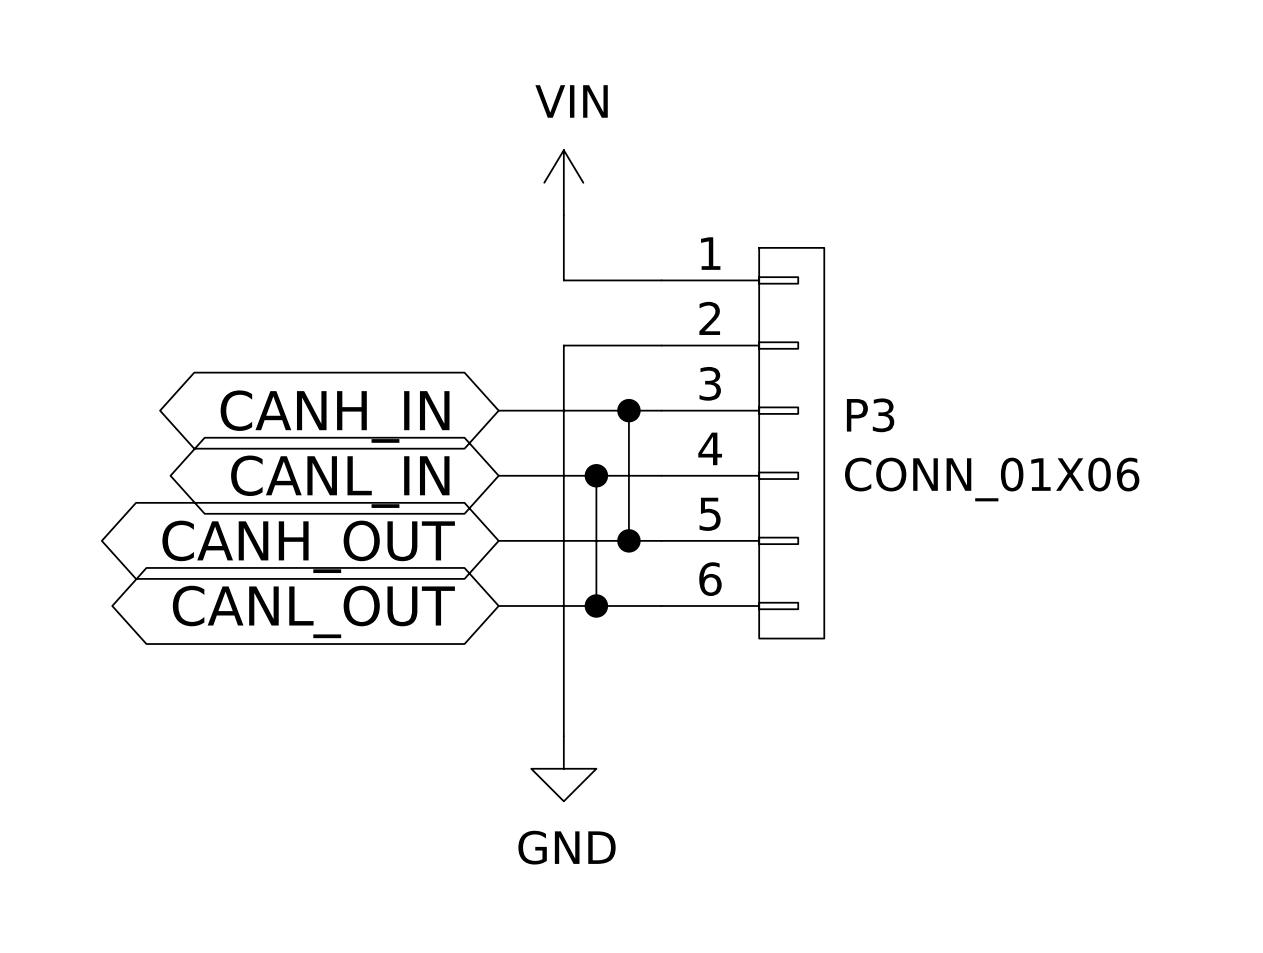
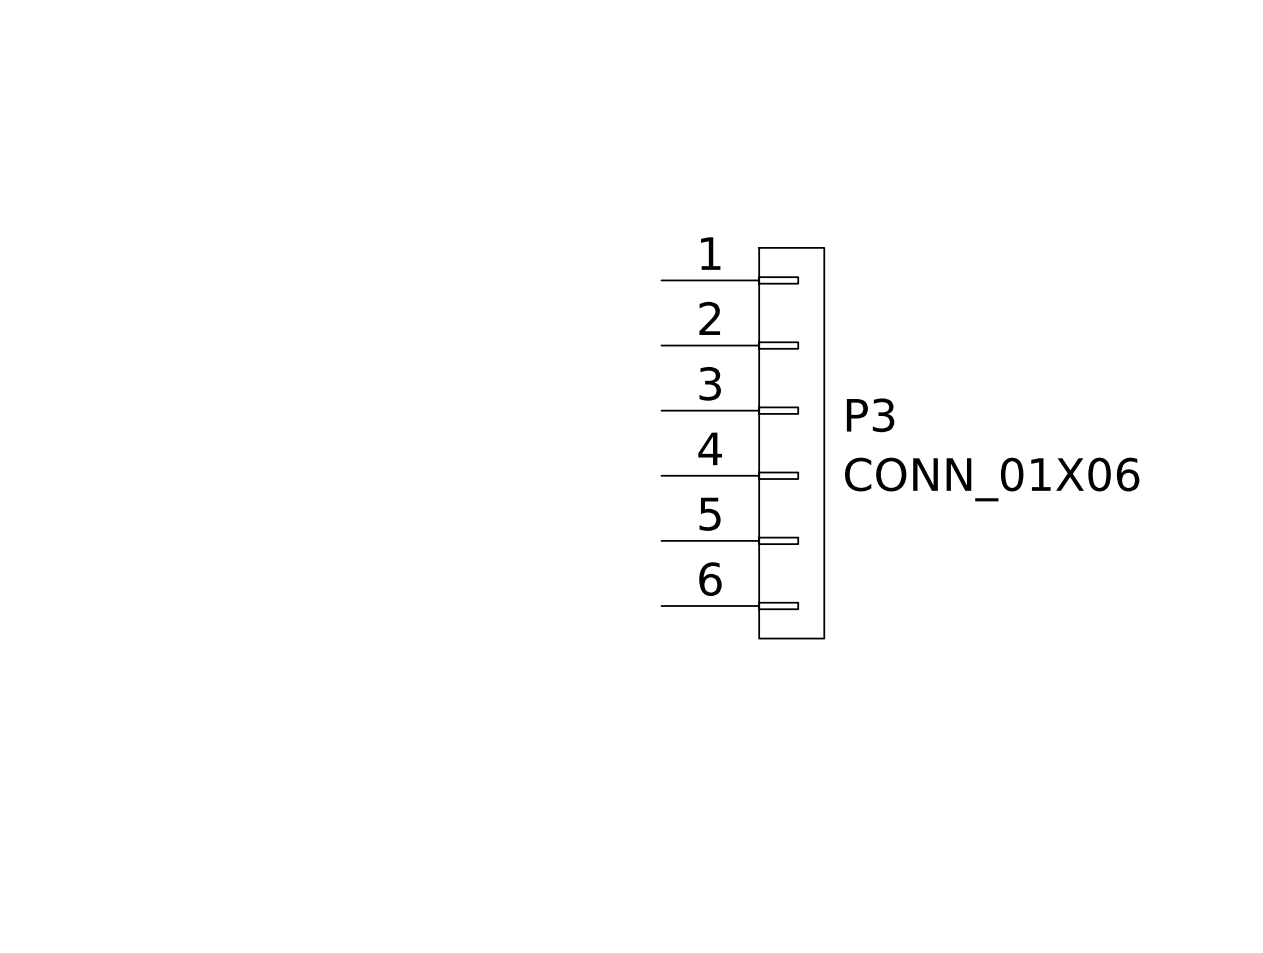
power symbol: VIN (563, 182) -> none
wire: (563, 215) (563, 280) (661, 280) -> none
wire: (661, 345) (563, 345) (563, 736) -> none
wire: (498, 410) (661, 410) -> none
wire: (628, 410) (628, 540) -> none
junction: (628, 410) -> none
global label: CANH_IN (335, 416) -> none
wire: (498, 475) (661, 475) -> none
wire: (596, 475) (596, 605) -> none
junction: (596, 475) -> none
global label: CANL_IN (340, 481) -> none
wire: (498, 540) (661, 540) -> none
junction: (628, 540) -> none
global label: CANH_OUT (308, 546) -> none
wire: (498, 605) (661, 605) -> none
junction: (596, 605) -> none
global label: CANL_OUT (313, 611) -> none
power symbol: GND (563, 768) -> none

